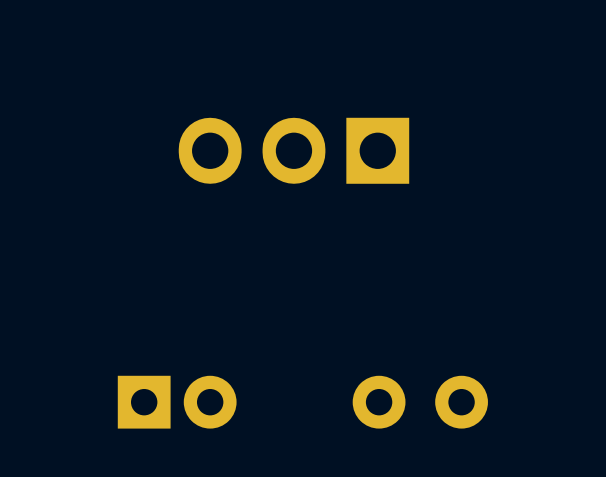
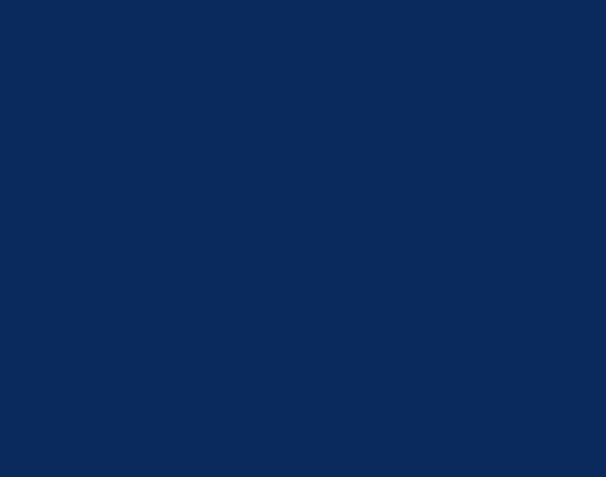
part: (293, 150) -> none
part: (177, 402) -> none
part: (420, 402) -> none

